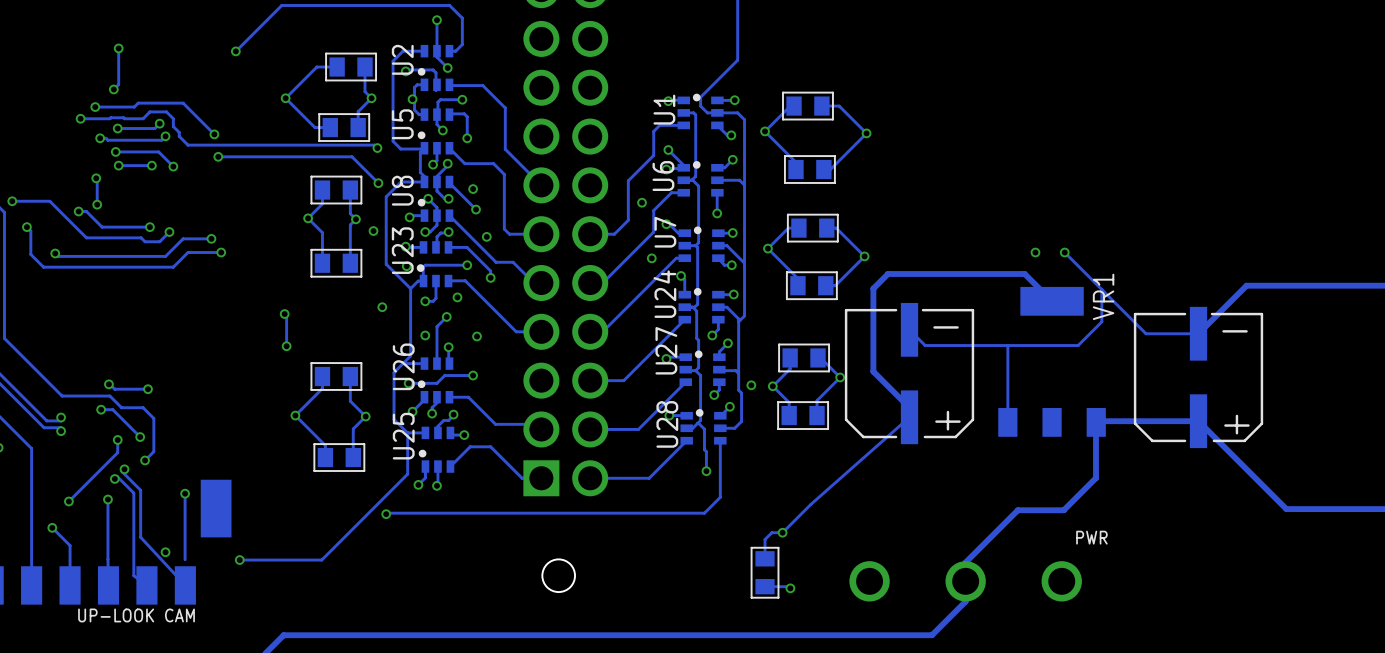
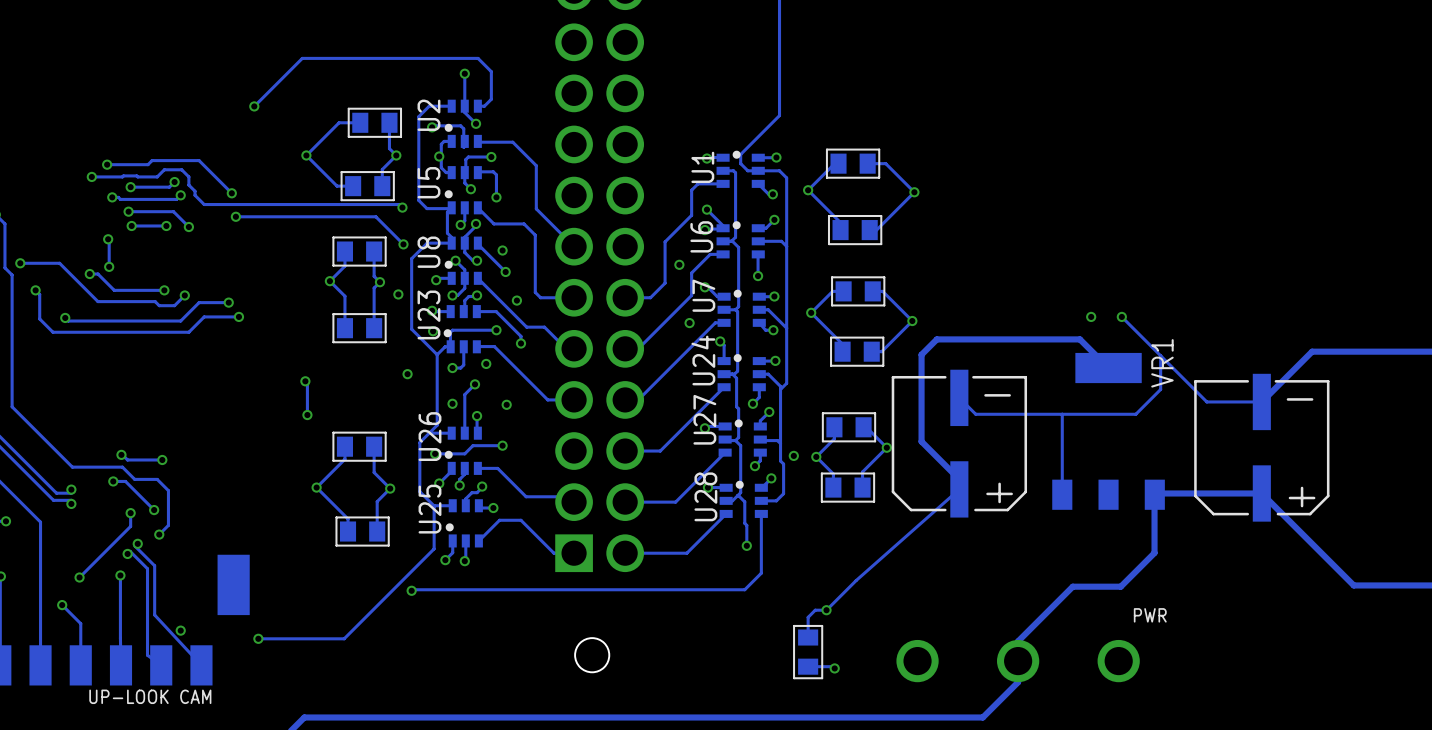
track: (118, 48) (118, 84) (113, 89) -> none
via: (118, 48) -> none
via: (113, 89) -> none
track: (185, 493) (185, 559) -> none
via: (185, 493) -> none

